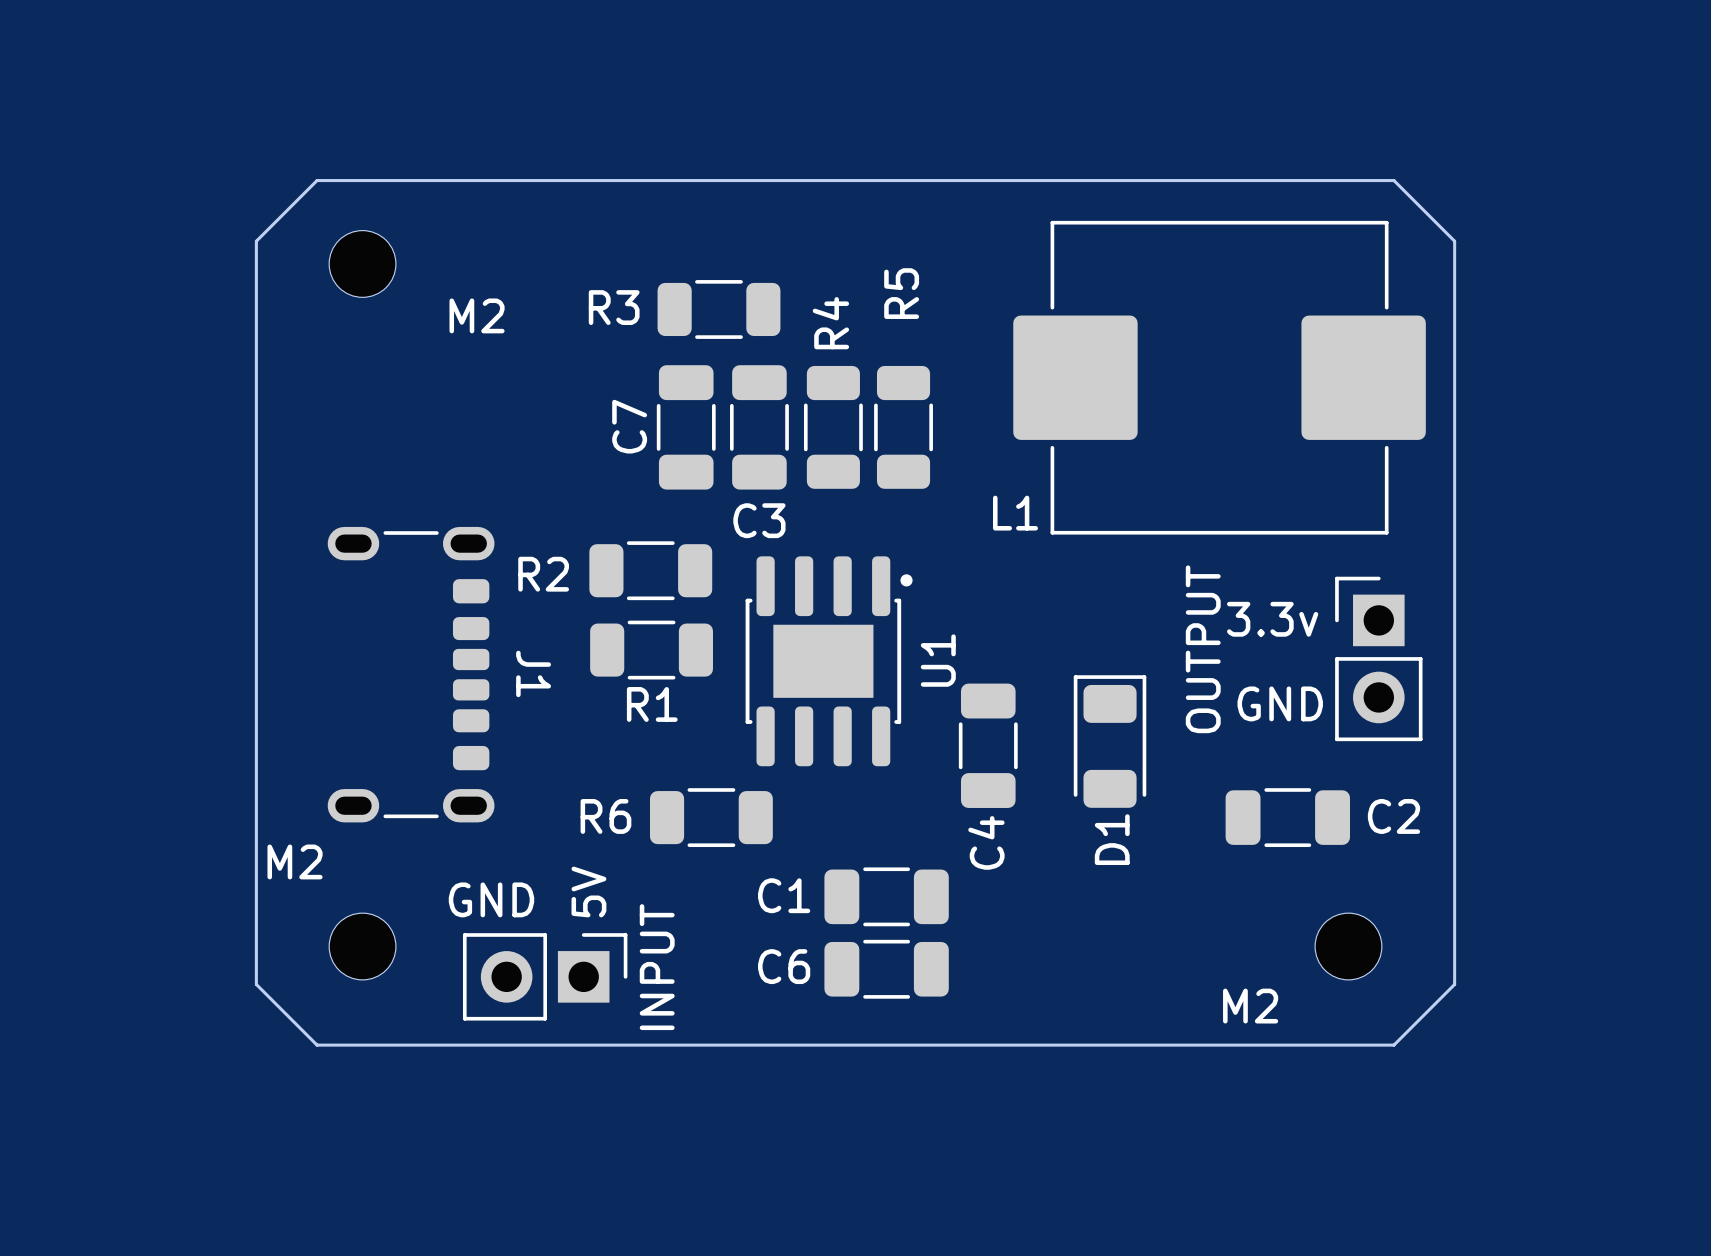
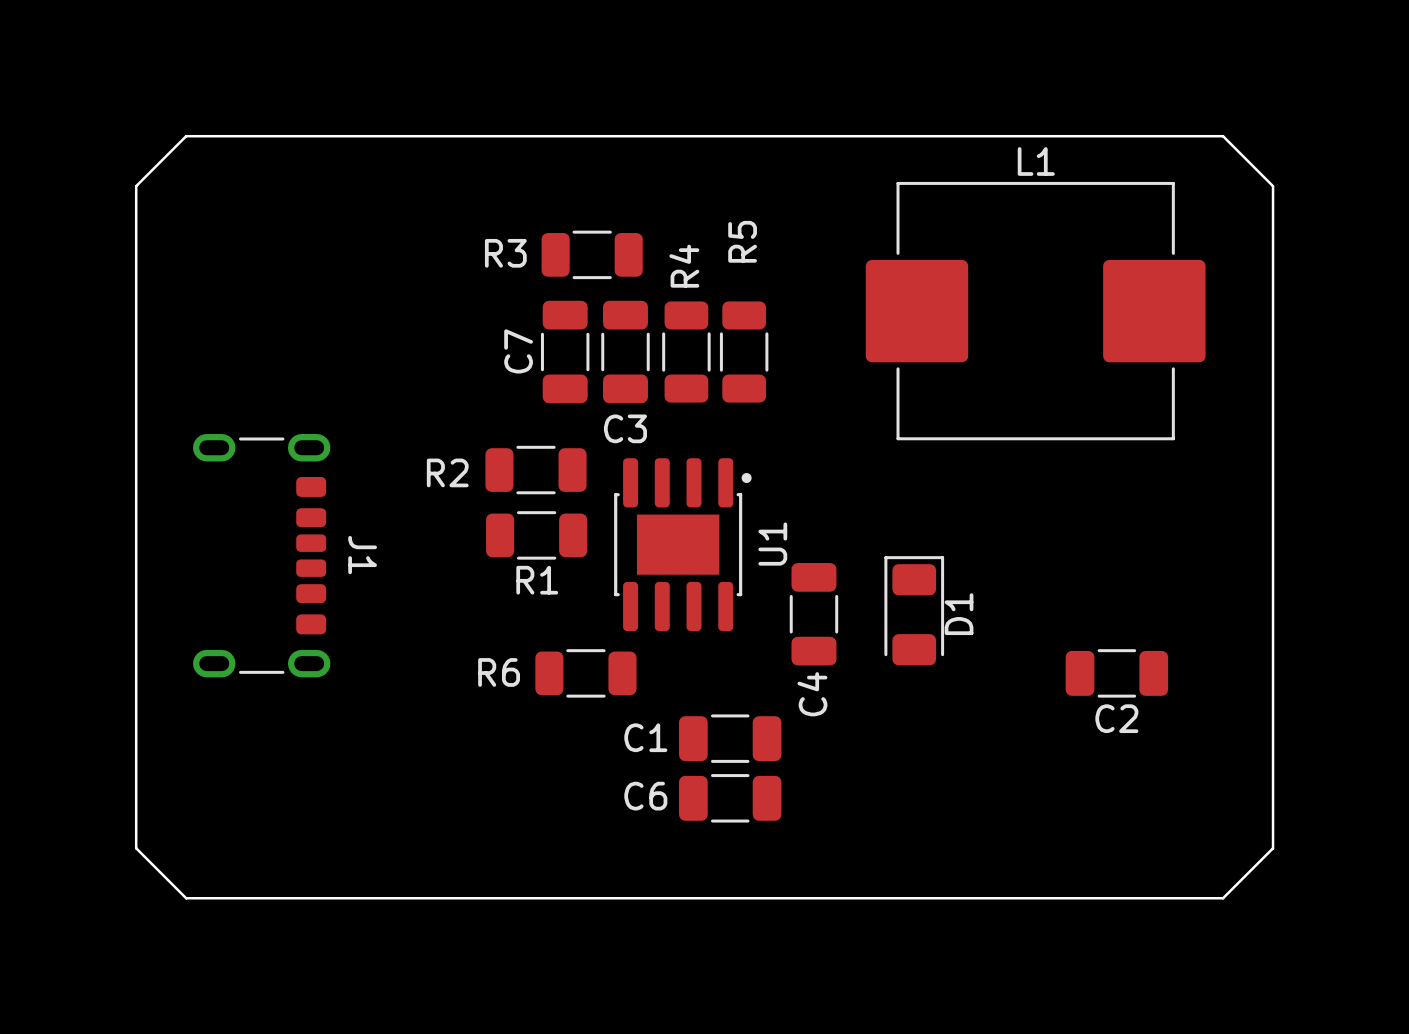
board edge: (317, 180) (256, 241) (256, 984) (317, 1045) (1393, 1045) (1454, 984) (1454, 241) (1393, 180) (317, 180) -> (186, 136) (136, 186) (136, 848) (186, 898) (1223, 898) (1273, 848) (1273, 186) (1223, 136) (186, 136)
M2: (362, 263) -> none
L1 position: (1219, 377) -> (1035, 311)
L1 name position: L1 (1015, 513) -> L1 (1036, 161)
text: 3.3v (1272, 619) -> none
text: OUTPUT (1203, 649) -> none
part: (1378, 658) -> none
J1 position: (411, 674) -> (261, 555)
text: GND (1280, 703) -> none
C2 name position: C2 (1393, 816) -> C2 (1116, 718)
C2 position: (1287, 817) -> (1116, 673)
D1 name position: D1 (1112, 839) -> D1 (959, 614)
text: 5V (588, 891) -> none
text: GND (491, 899) -> none
M2: (362, 946) -> none
M2: (1348, 946) -> none
INPUT: (545, 976) -> none

